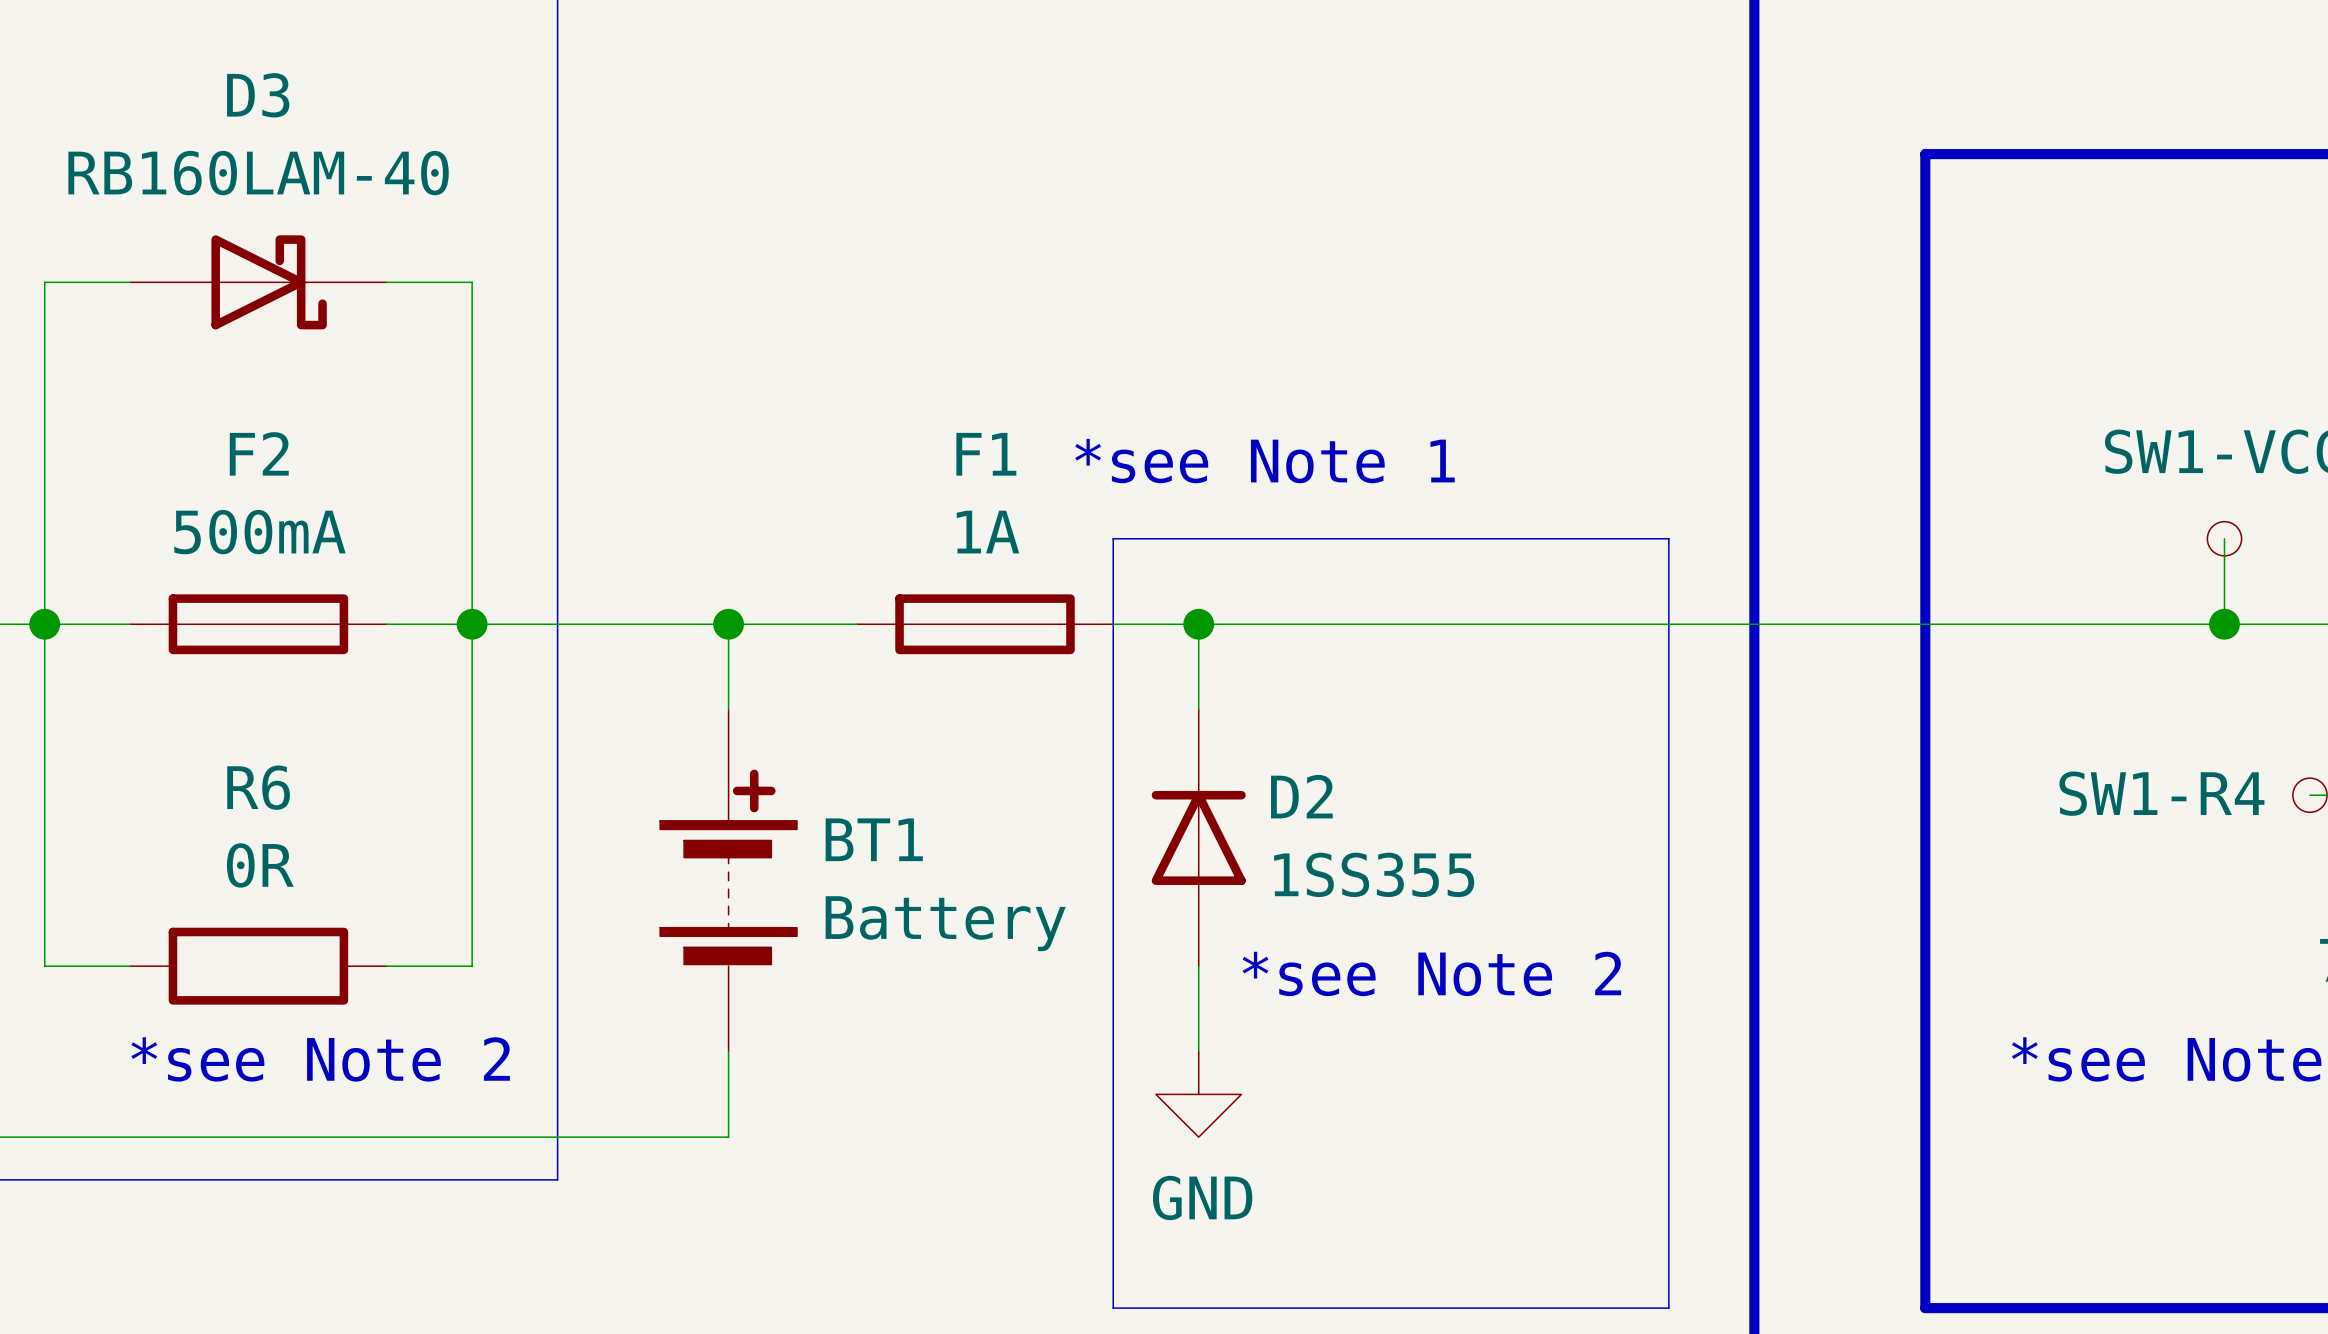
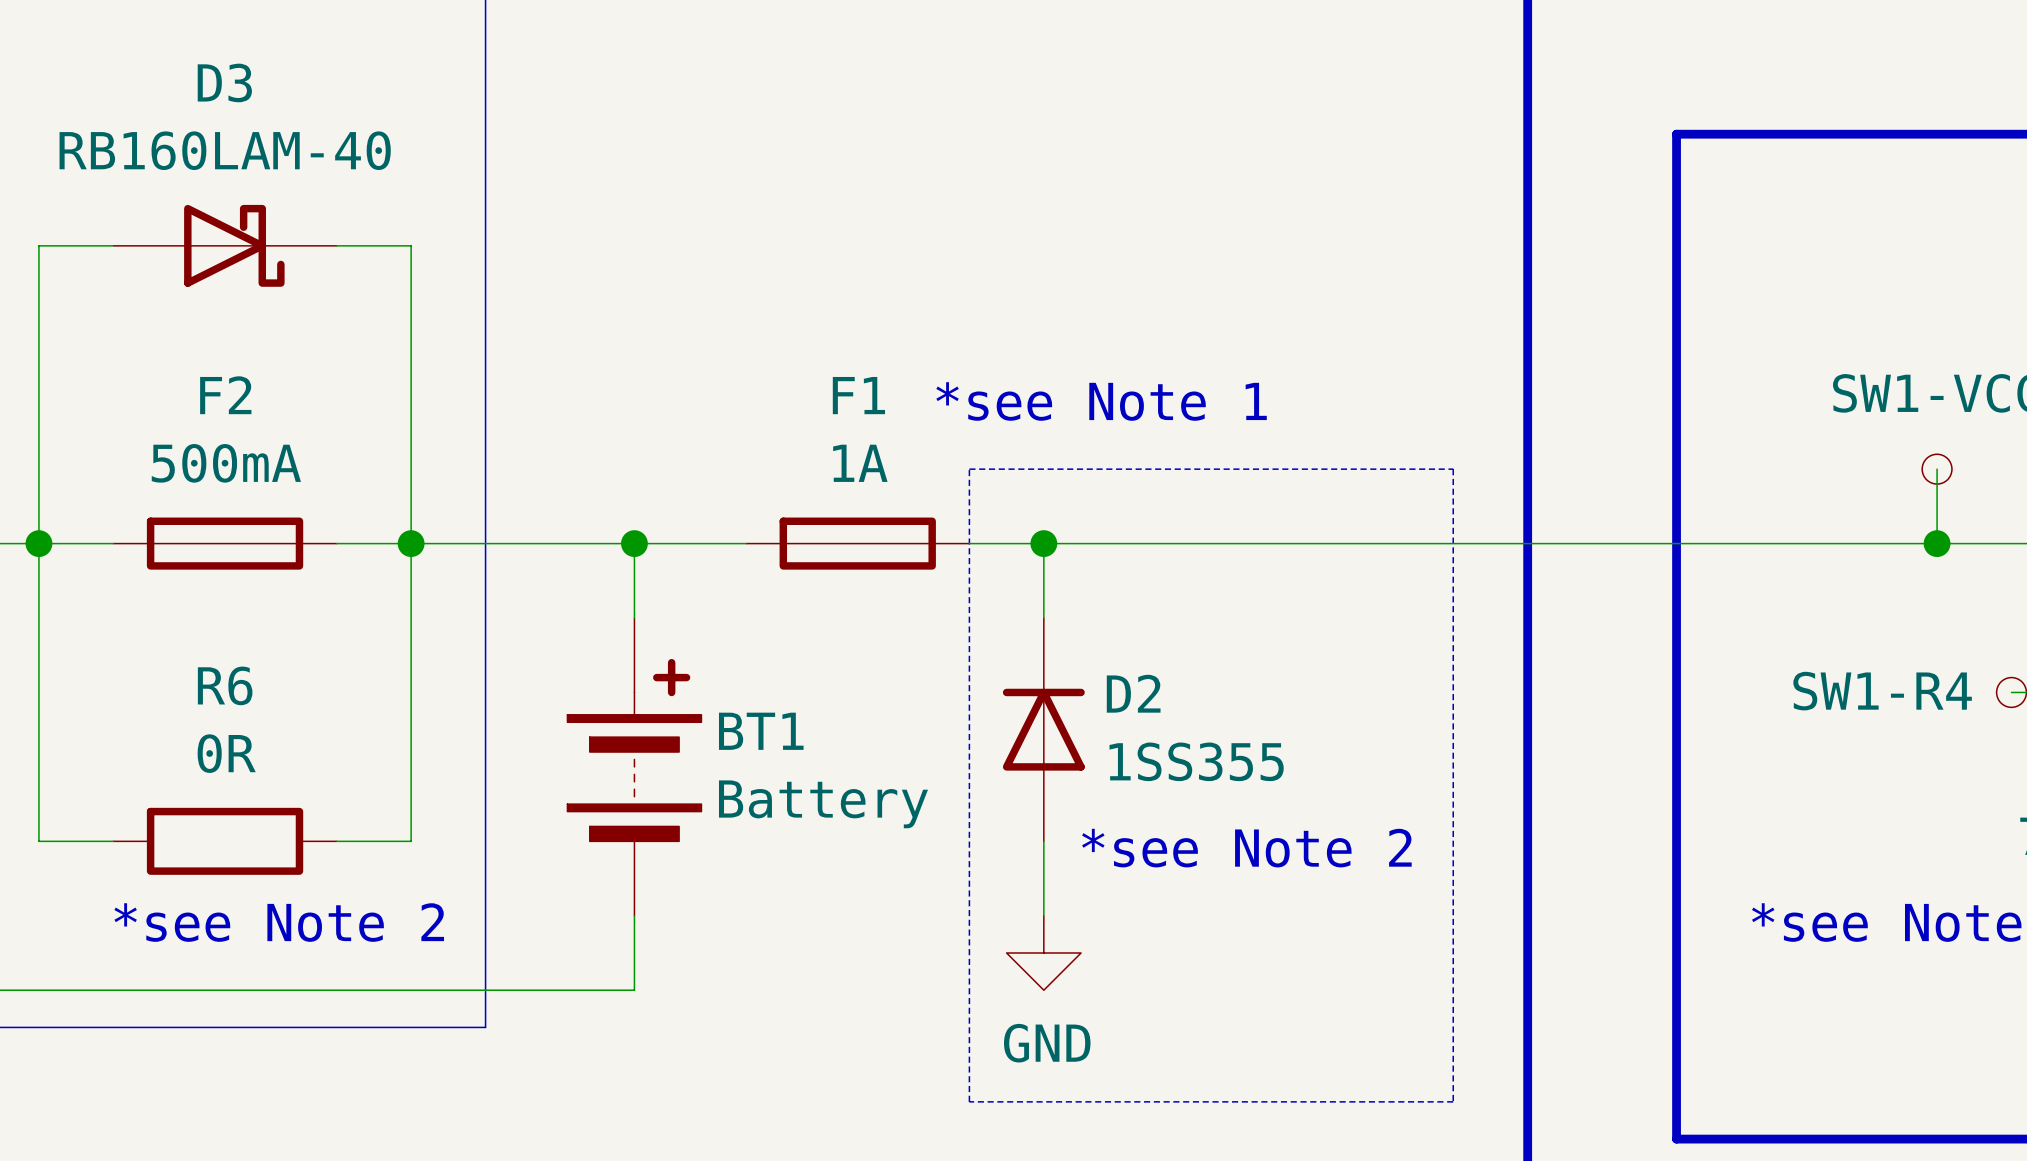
line: (1113, 538) (1668, 538) (1668, 1308) (1113, 1308) (1113, 538) -> (969, 469) (969, 1101) (1453, 1101) (1453, 469) (969, 469)
BT1 symbol: [660, 709, 797, 1052] -> [567, 618, 702, 916]

